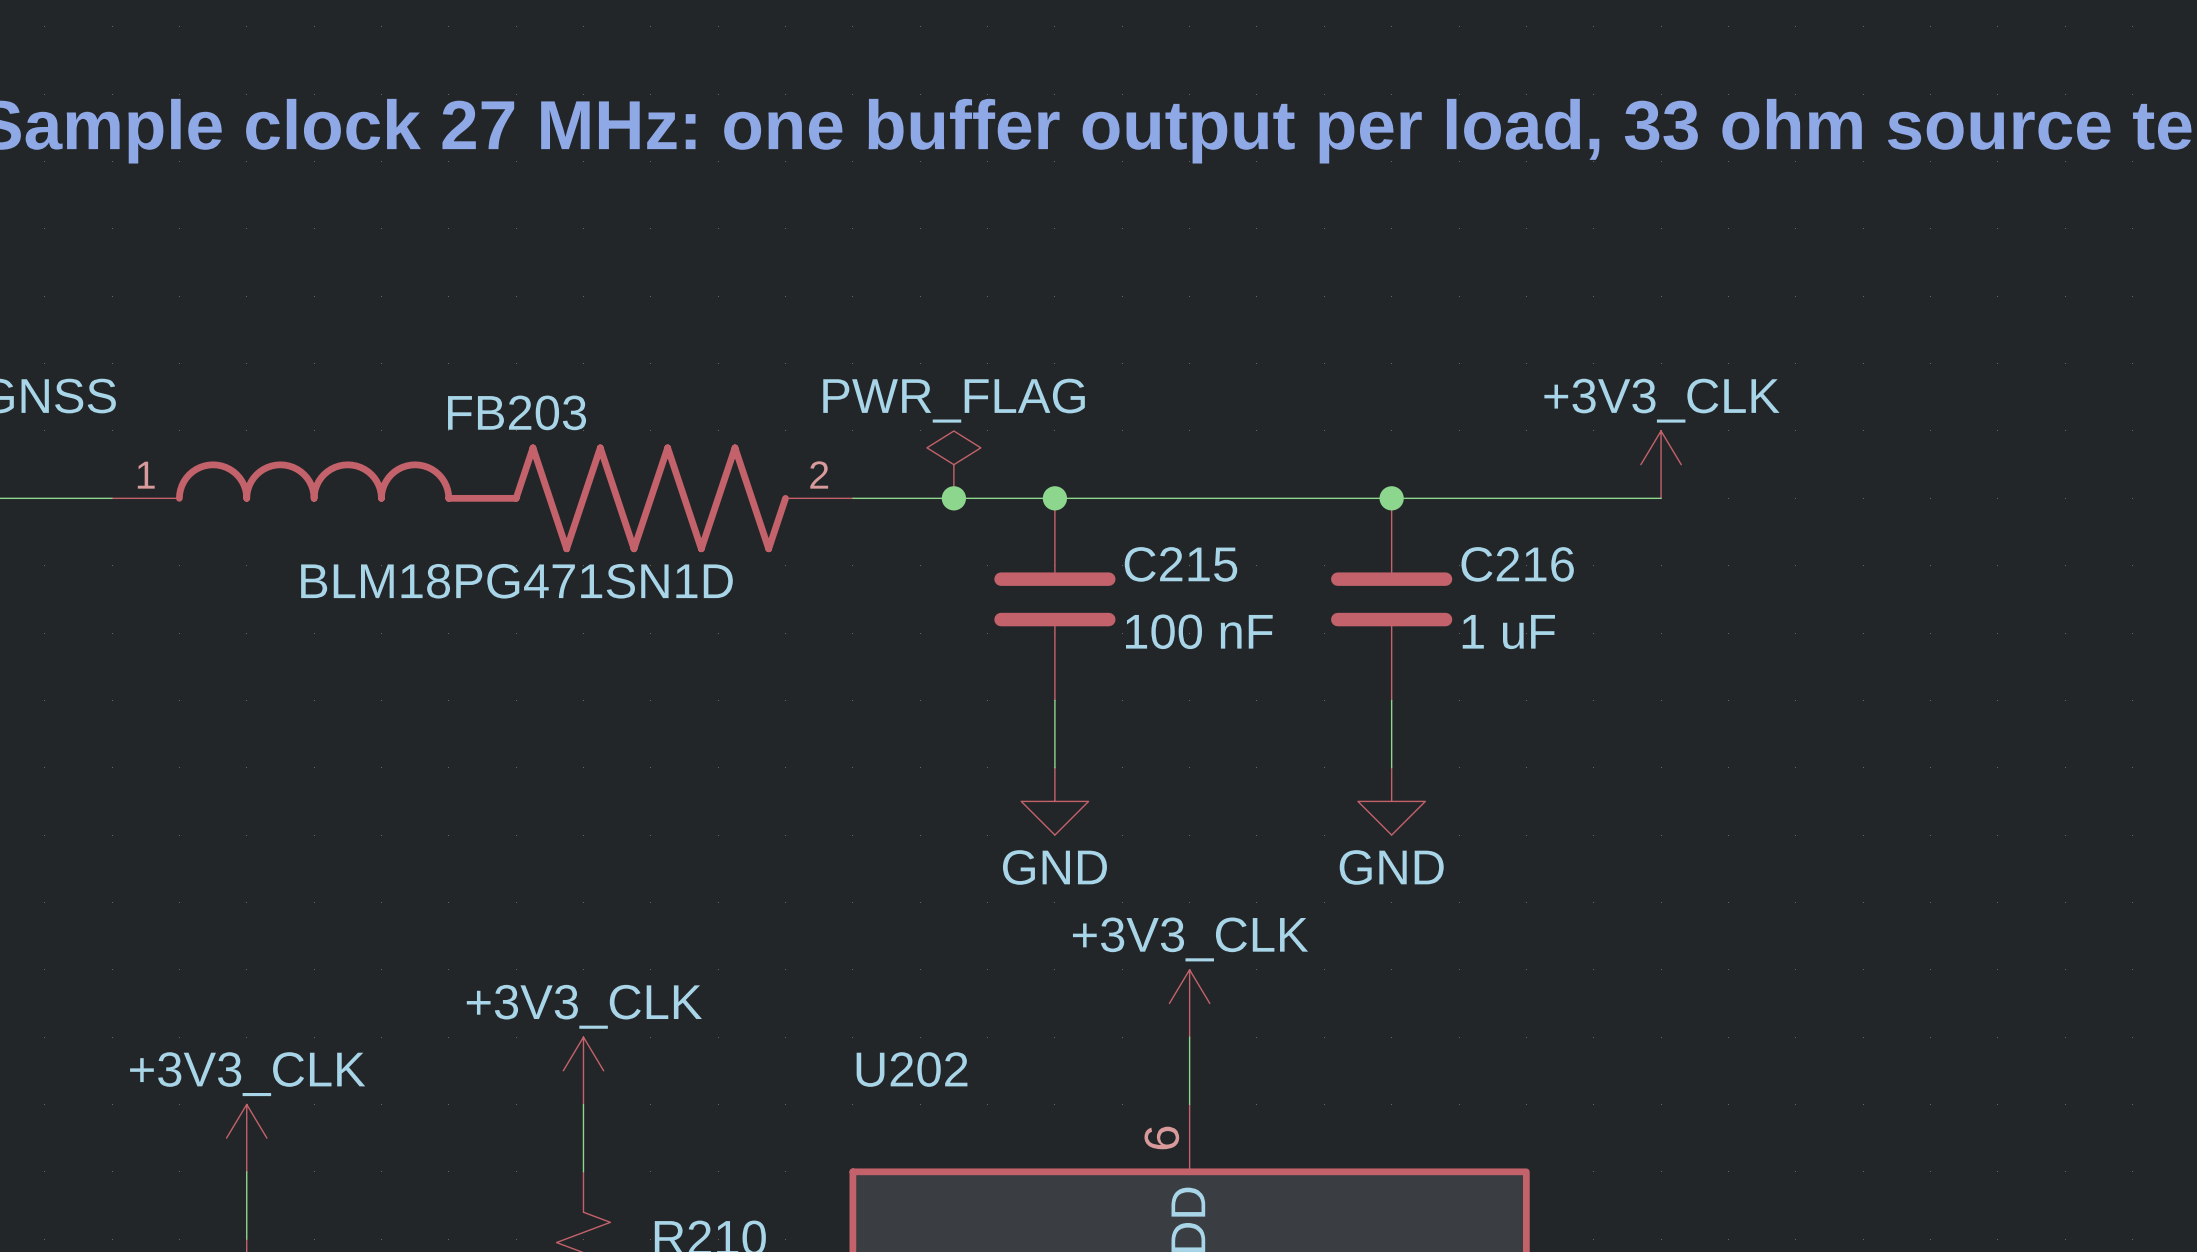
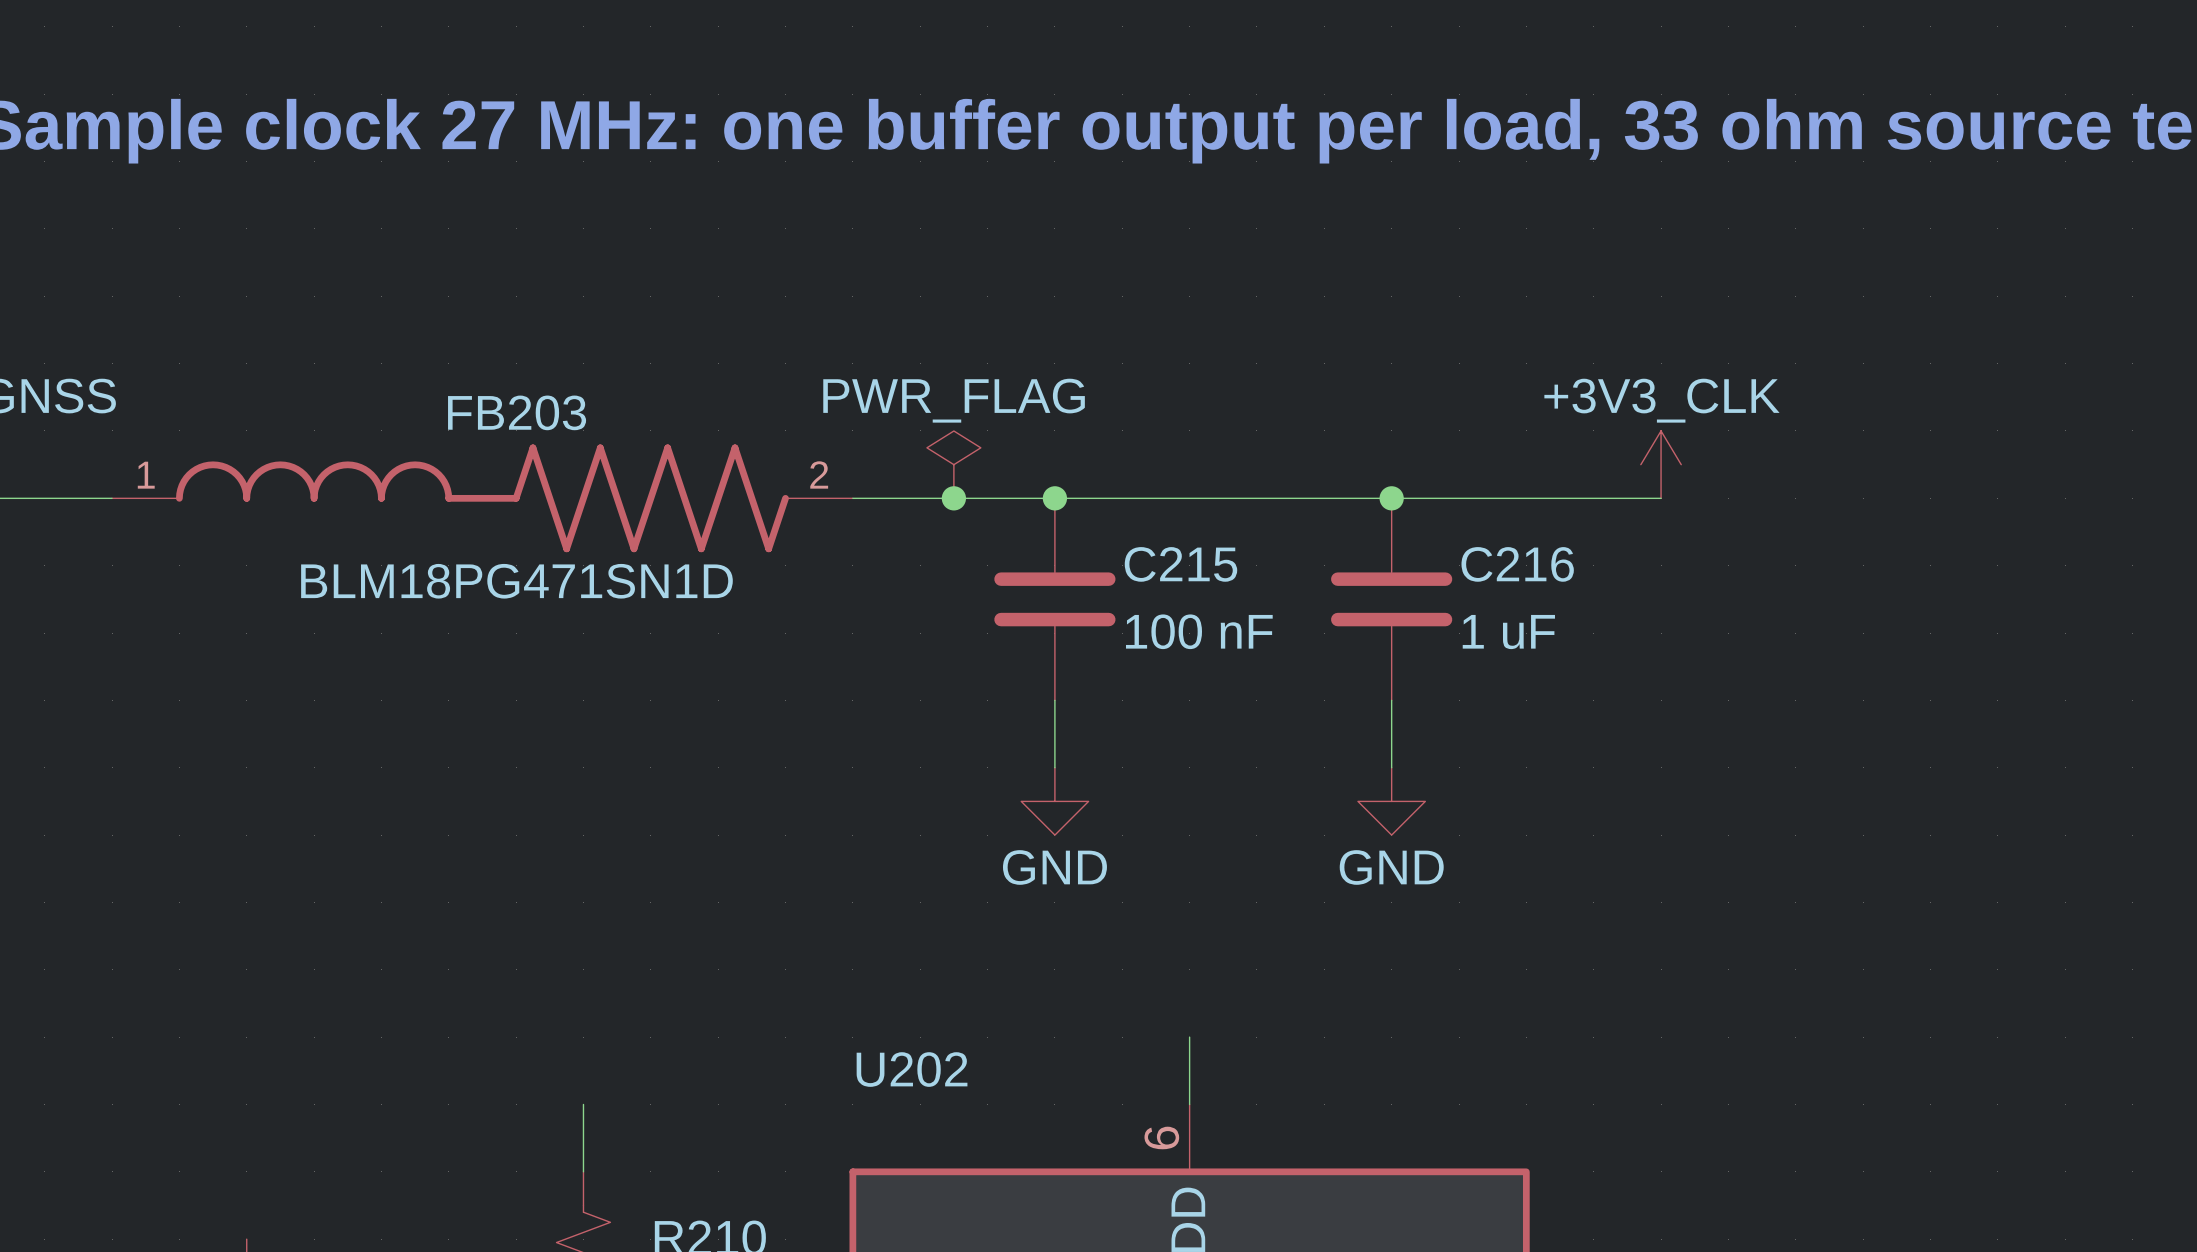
power symbol: +3V3_CLK (1189, 1003) -> none
power symbol: +3V3_CLK (583, 1070) -> none
power symbol: +3V3_CLK (246, 1138) -> none
wire: (246, 1171) (246, 1239) -> none

